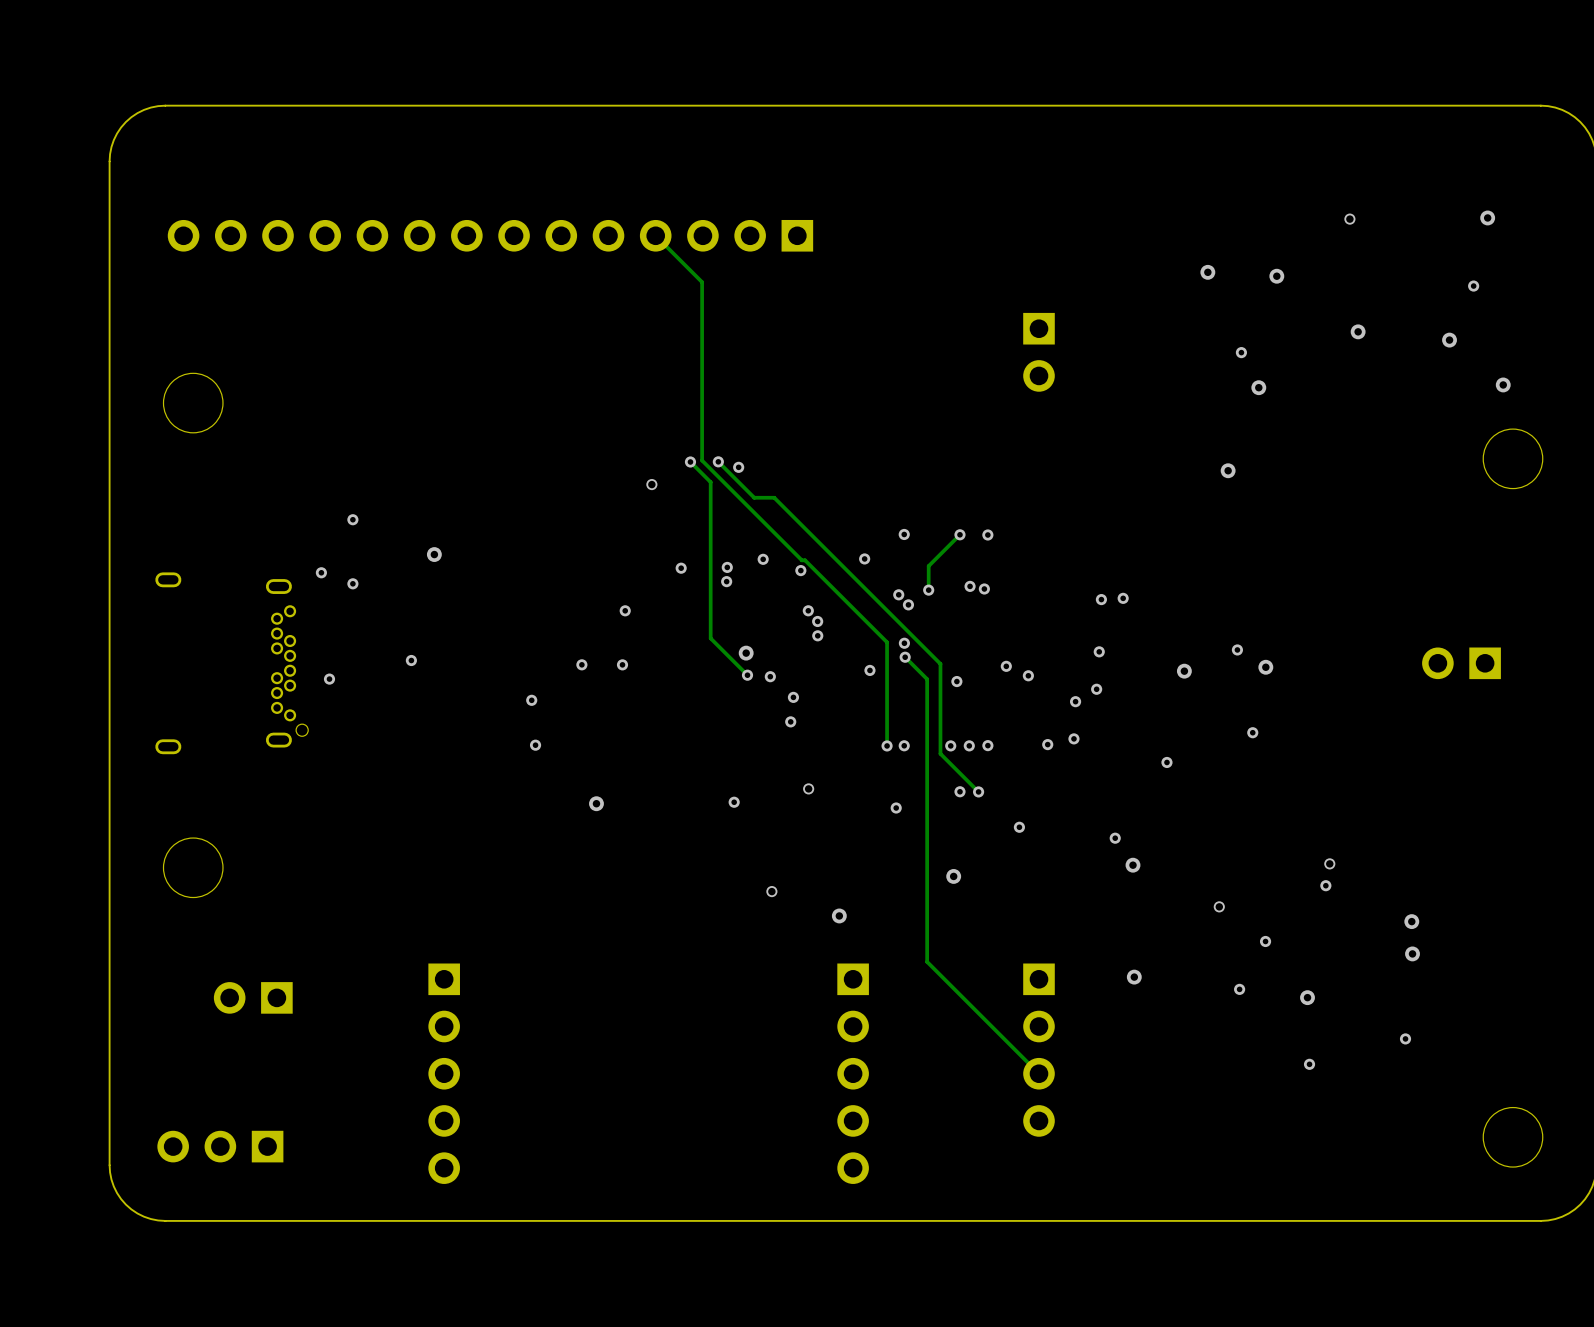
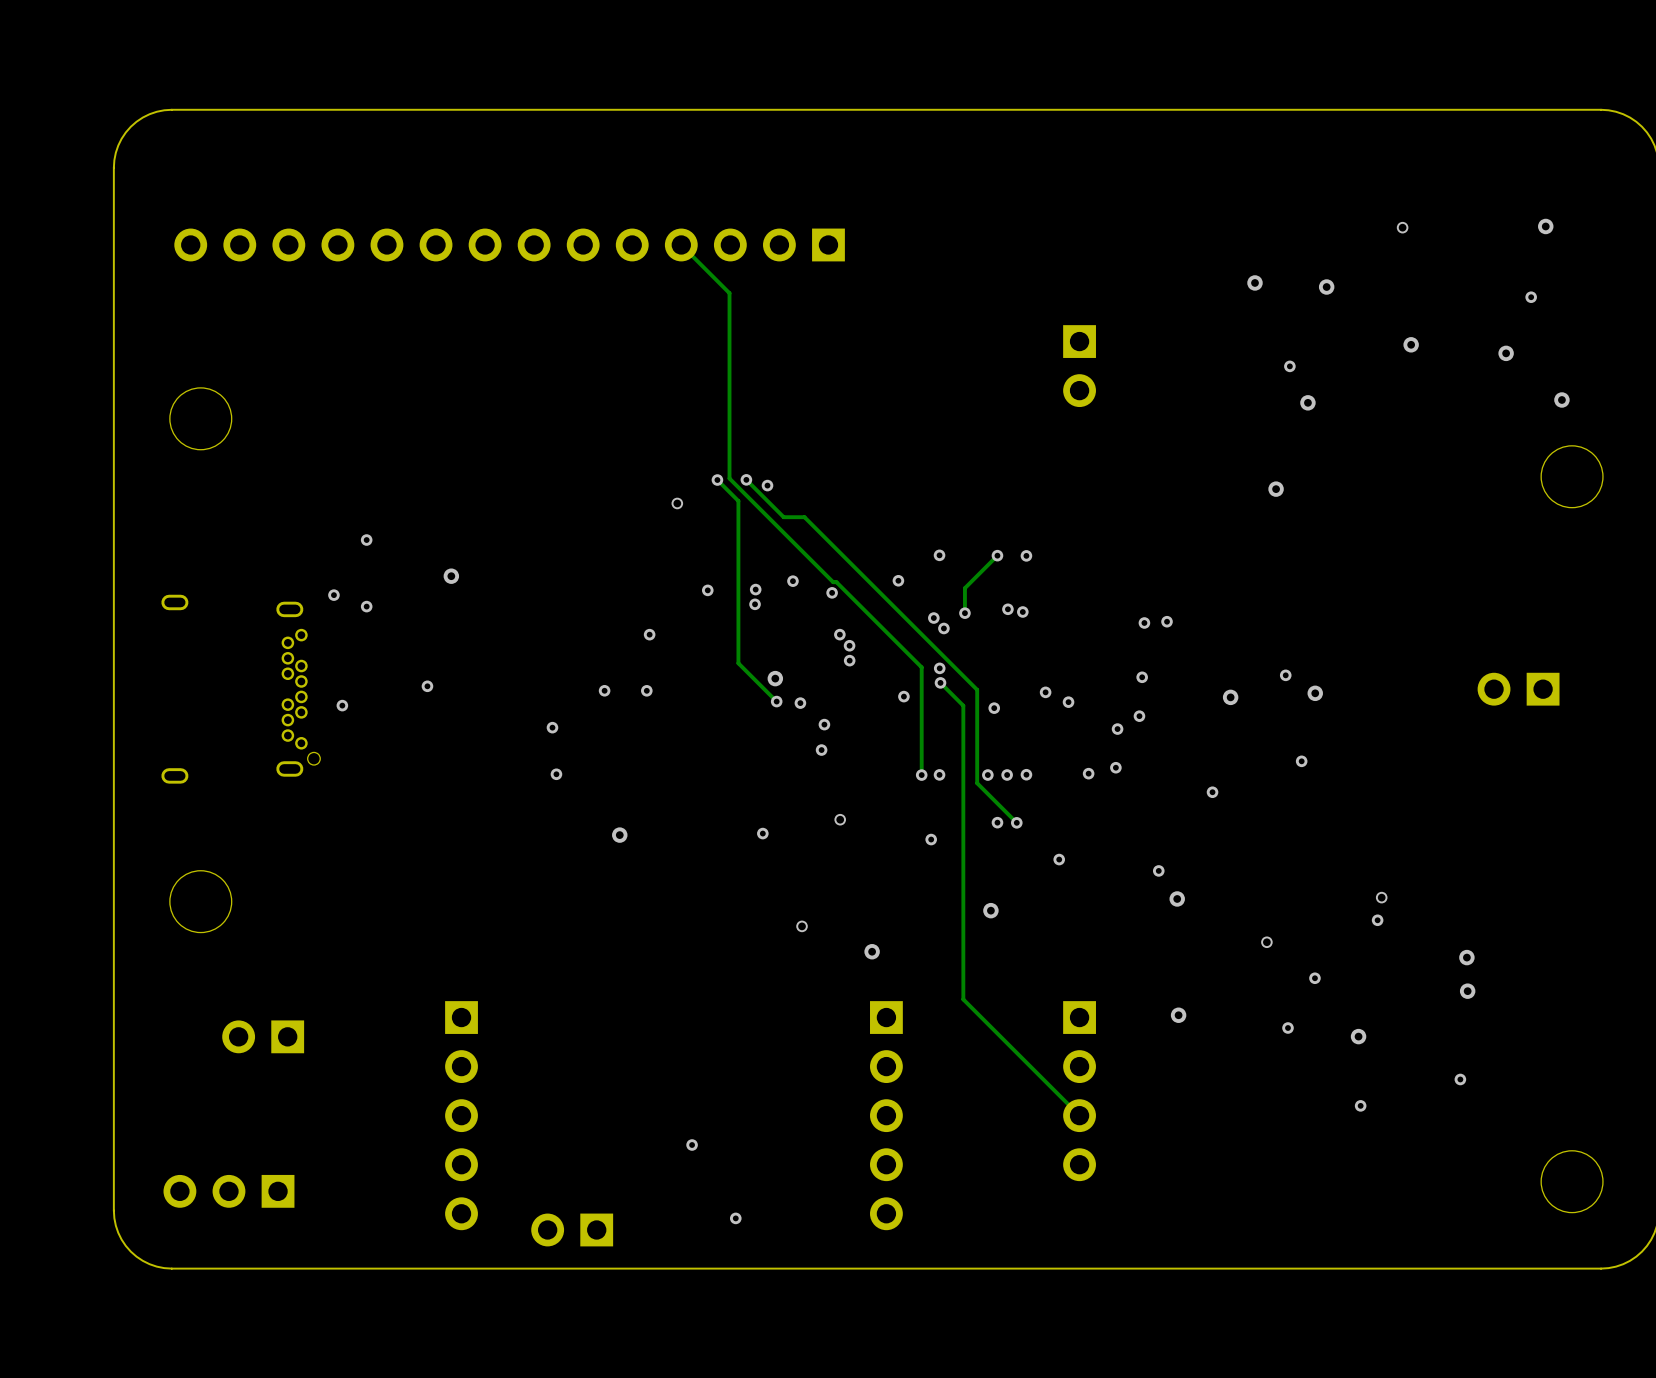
via: none -> (692, 1145)
via: none -> (735, 1218)
part: none -> (572, 1229)

